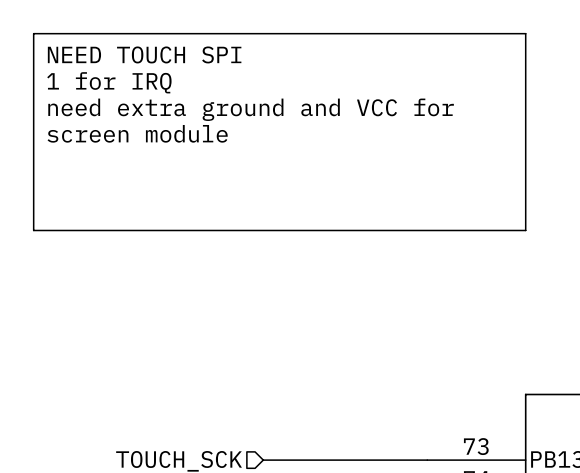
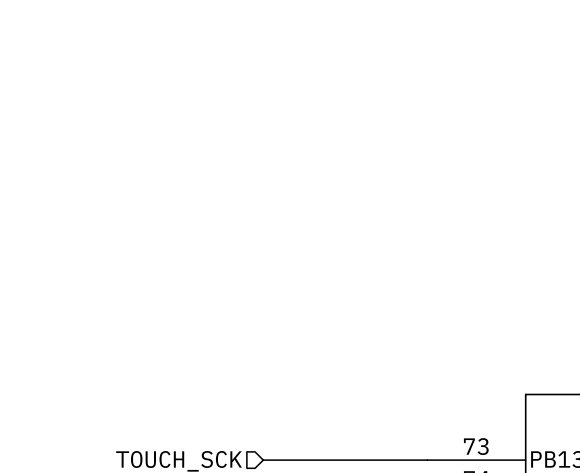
line: (33, 33) (525, 33) (525, 230) (33, 230) (33, 33) -> none
text: NEED TOUCH SPI (144, 54) -> none
text: 1 for IRQ (109, 82) -> none
text: need extra ground and VCC for (251, 109) -> none
text: screen module (137, 133) -> none

